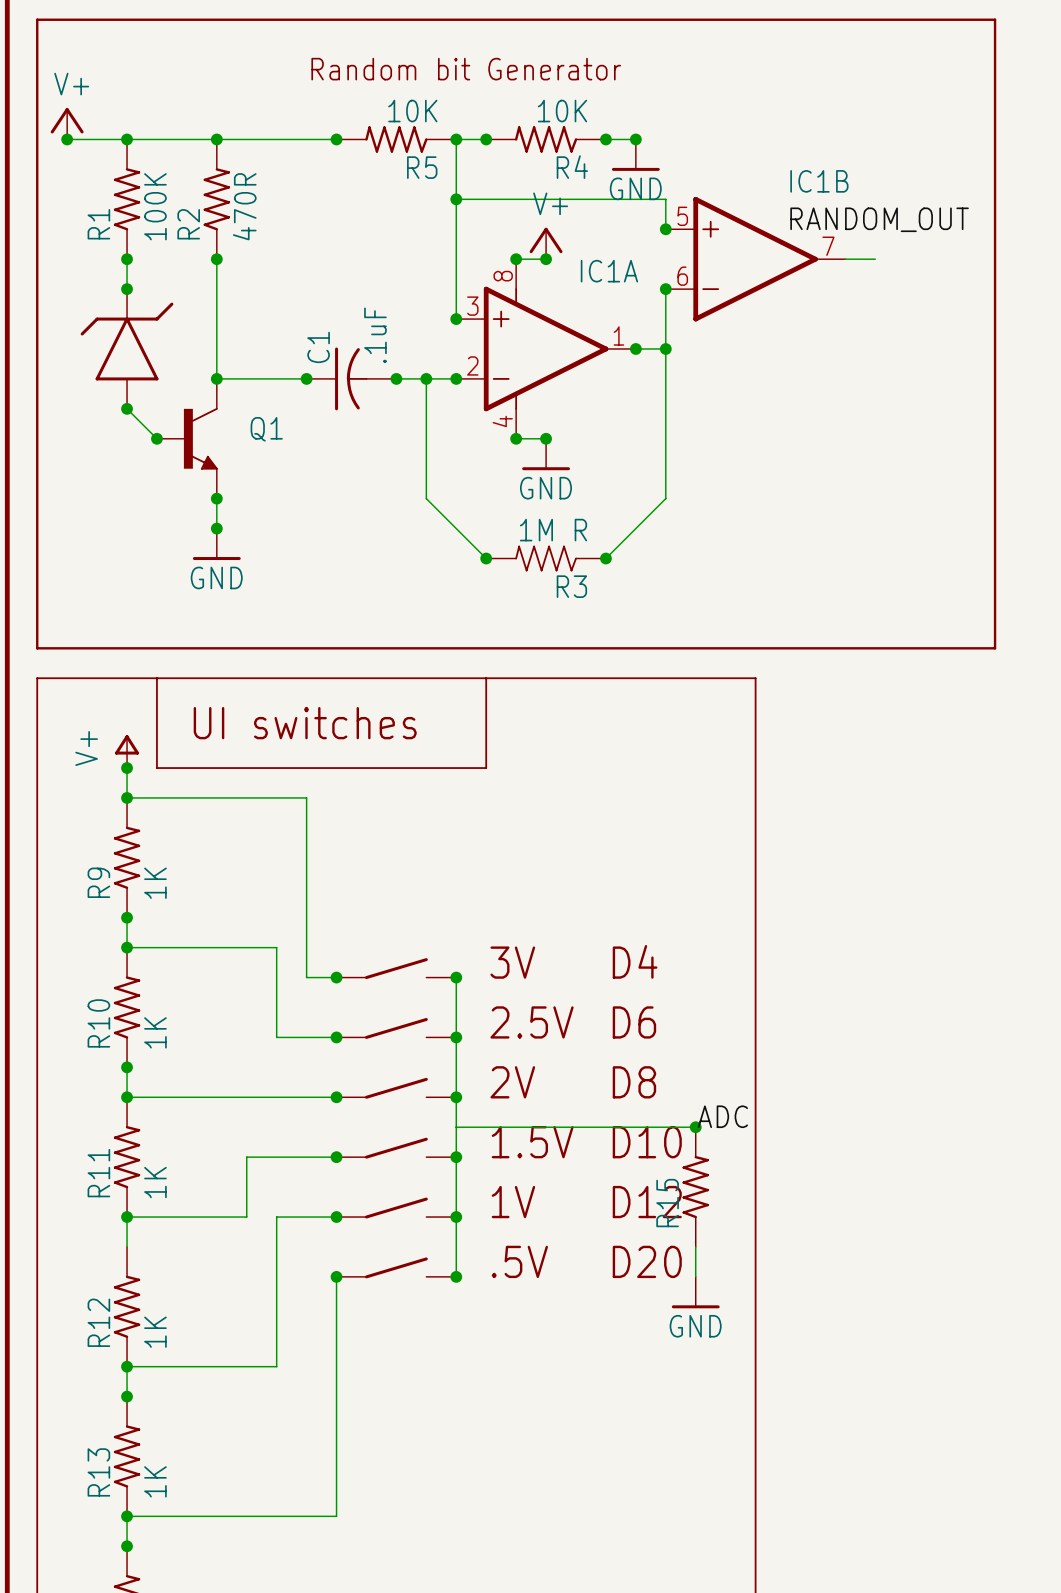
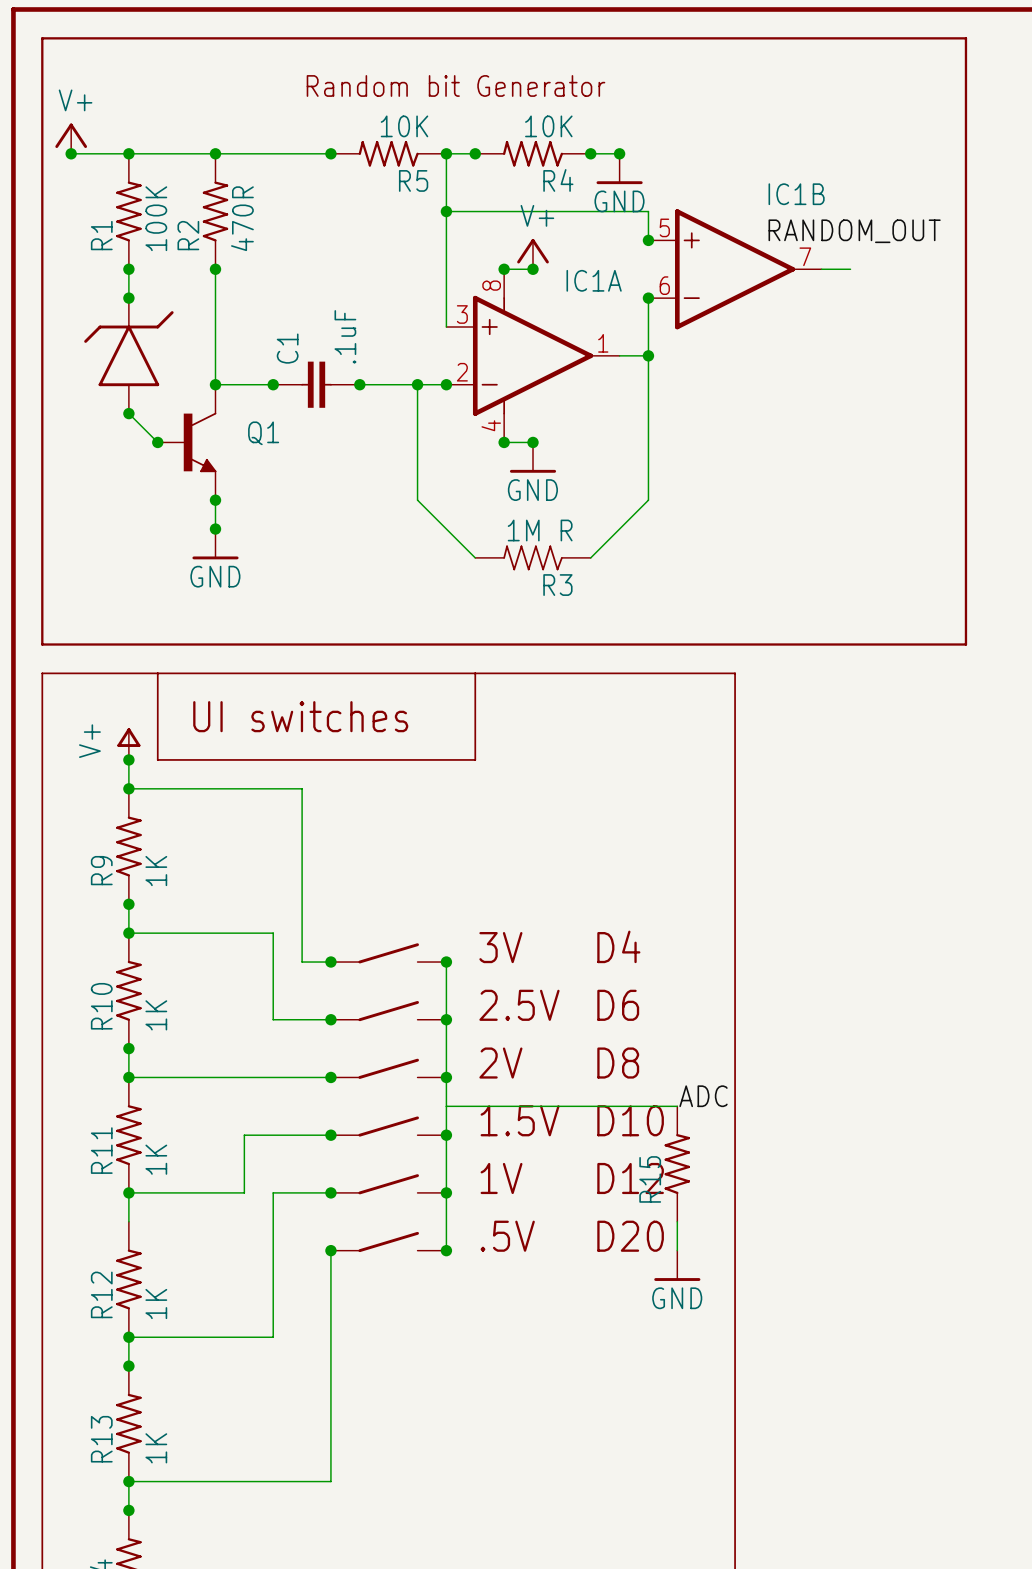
junction: (456, 319) -> none
C1 symbol: [306, 347, 397, 411] -> [273, 361, 360, 408]
junction: (635, 348) -> none
junction: none -> (273, 384)
junction: (306, 378) -> none
junction: none -> (359, 384)
junction: (396, 378) -> none
junction: (486, 558) -> none
junction: (605, 558) -> none
junction: (695, 1127) -> none

